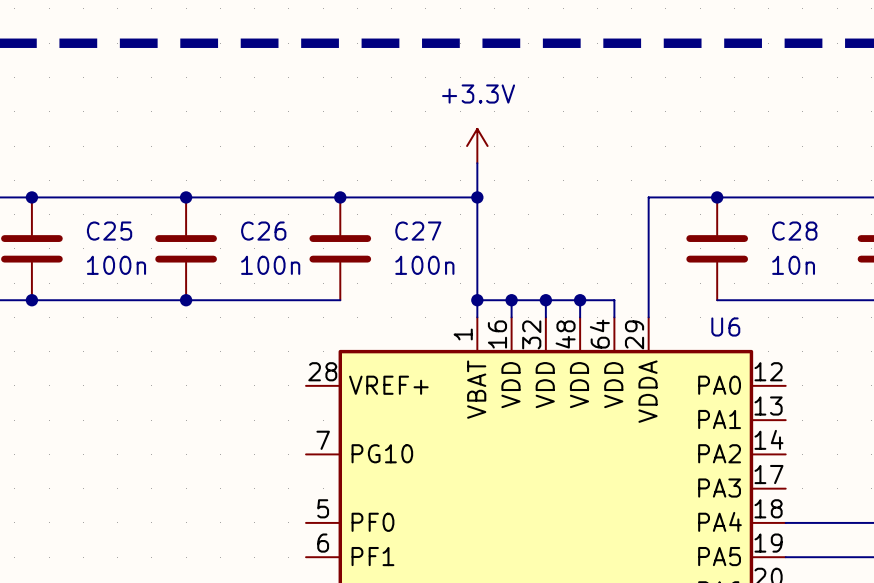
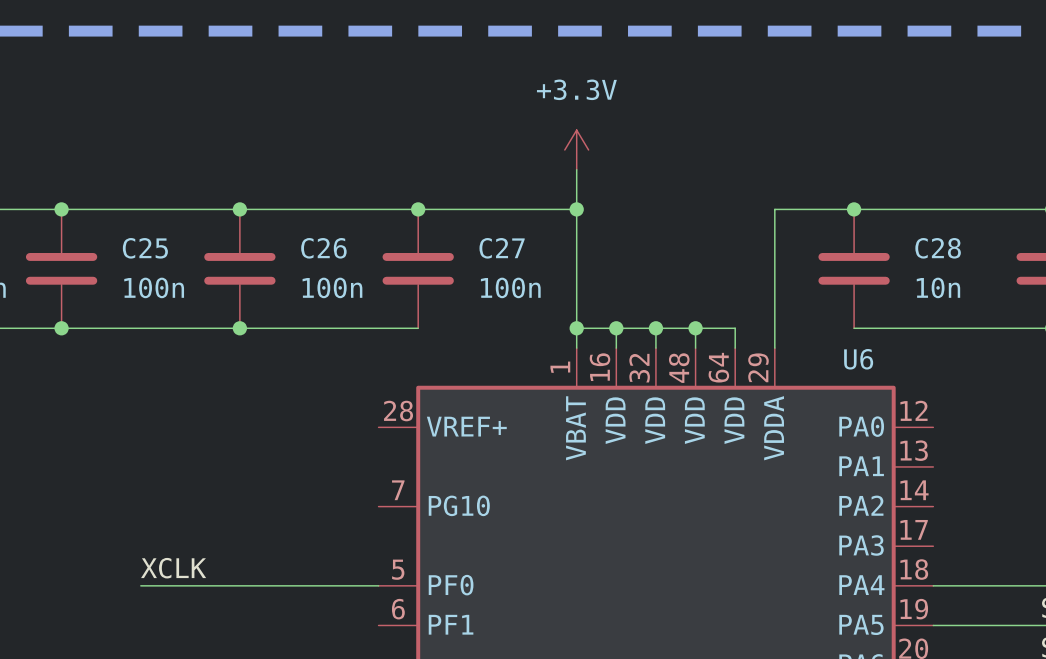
label: none -> XCLK (173, 568)
wire: none -> (140, 585) (378, 585)

